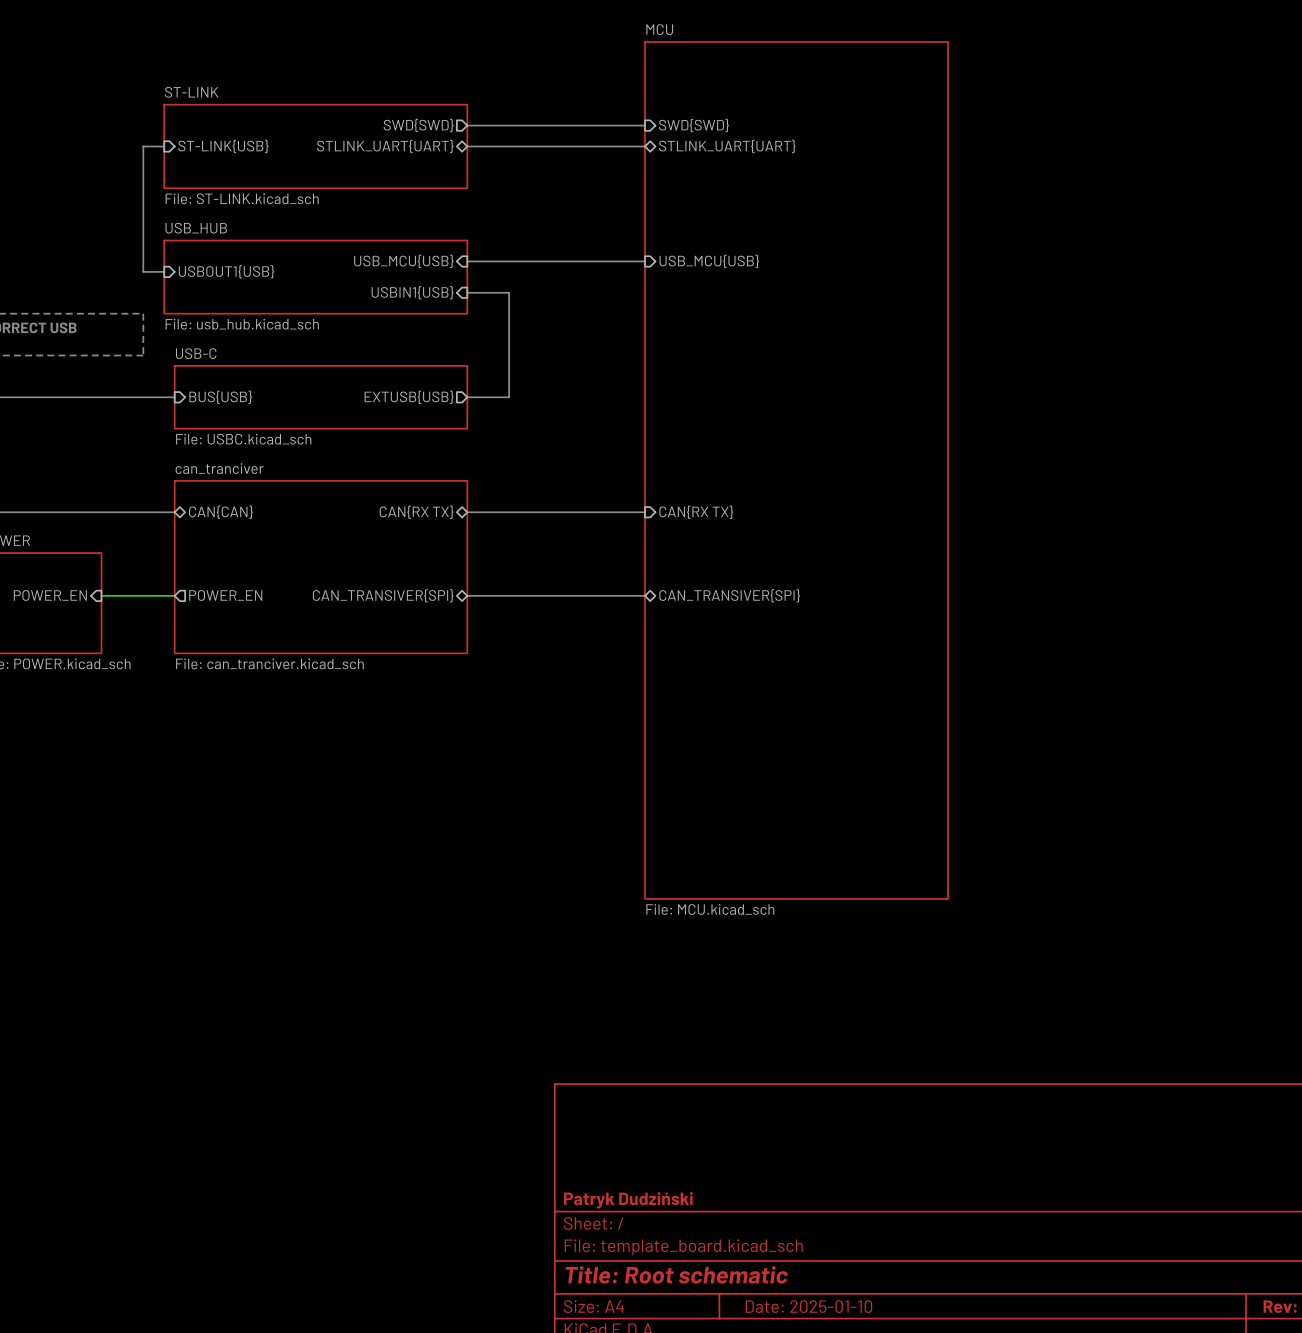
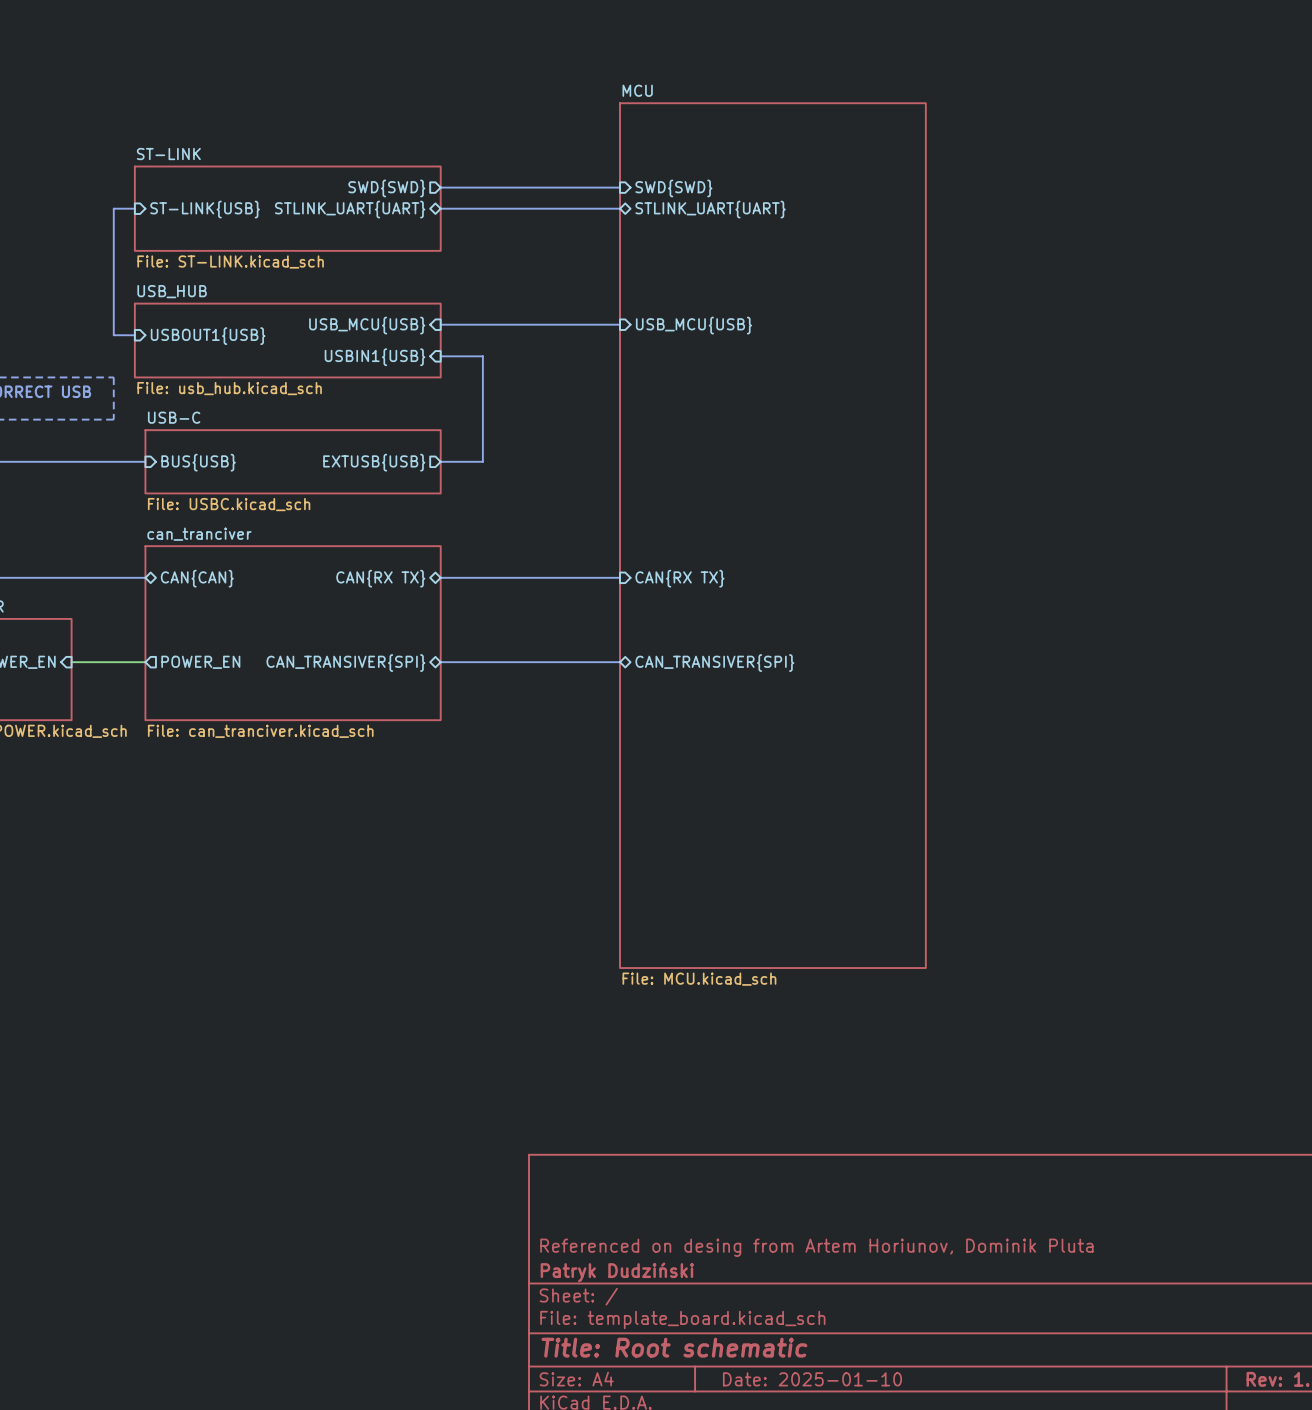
title block: none -> Referenced on desing from Artem Horiunov, Dominik Pluta (816, 1247)

